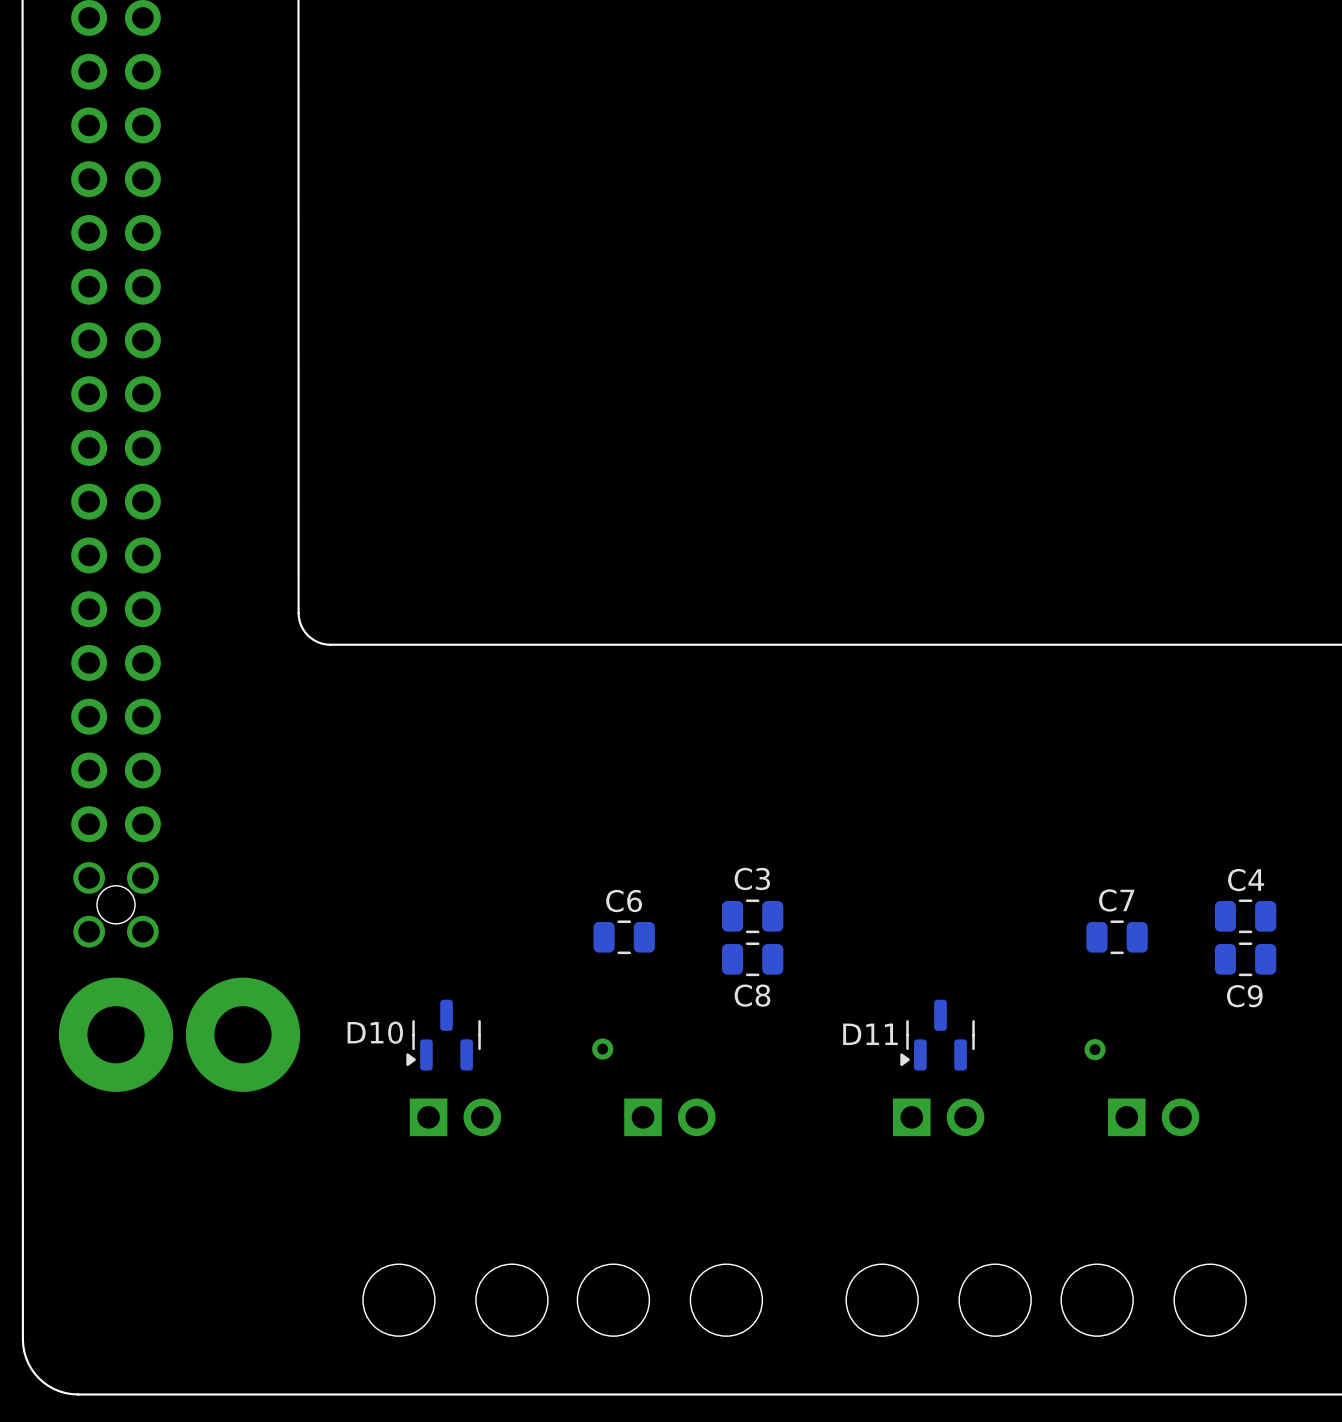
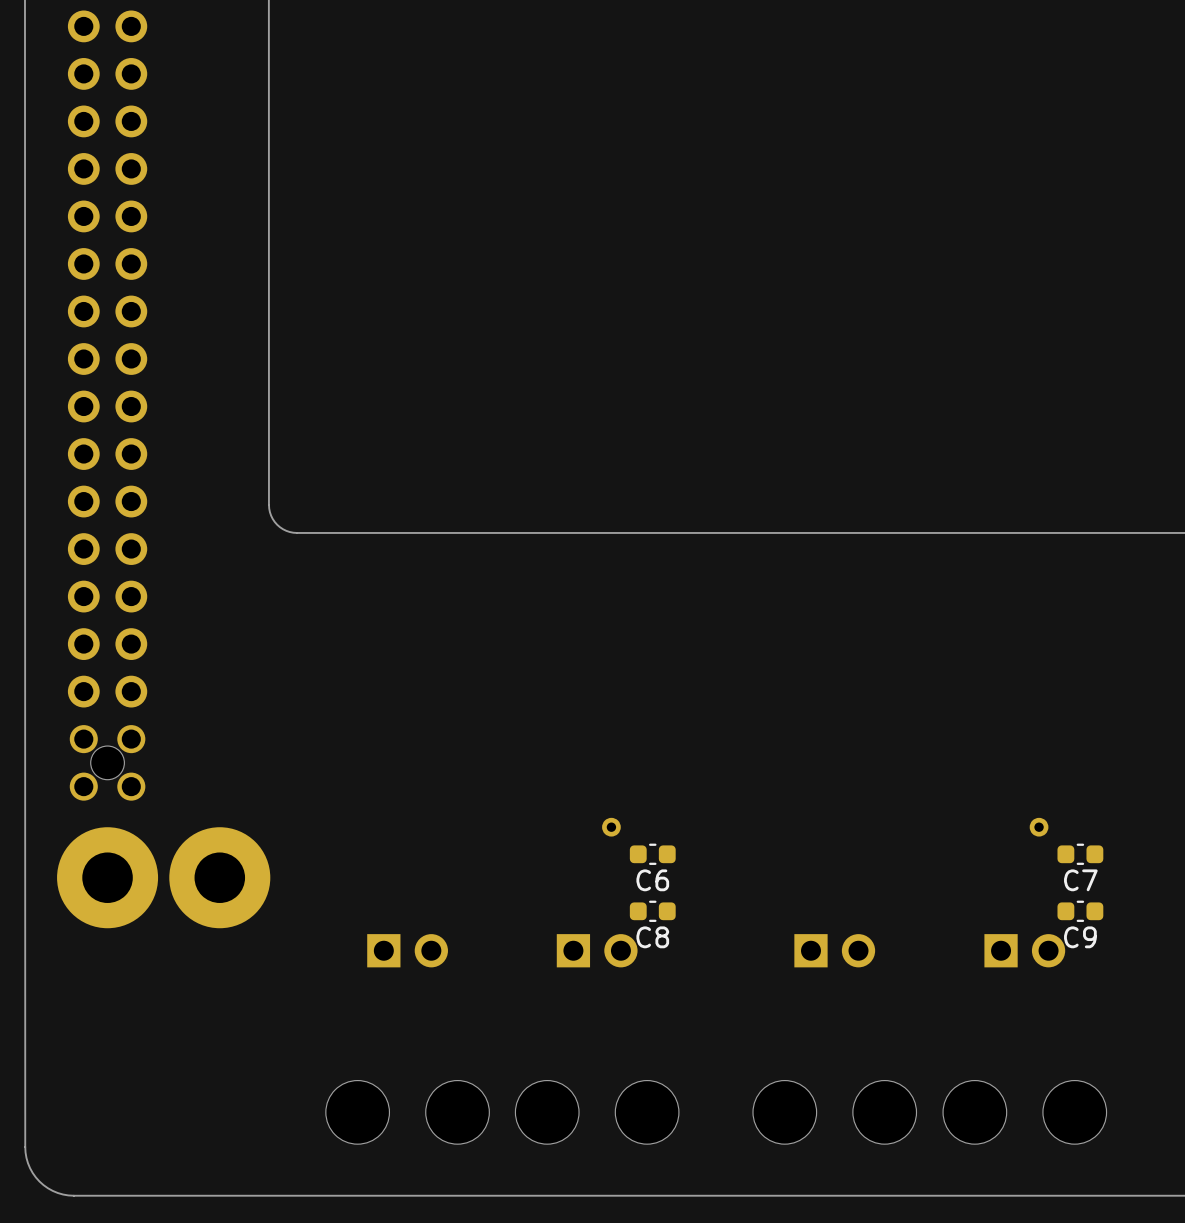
C7 name position: C7 (1116, 900) -> C7 (1080, 880)
C6 name position: C6 (624, 901) -> C6 (652, 880)
C3: (752, 916) -> none
C4: (1245, 916) -> none
C6 footprint: [593, 920, 655, 955] -> [629, 843, 676, 865]
C7 footprint: [1086, 920, 1148, 955] -> [1057, 843, 1104, 865]
C8 footprint: [721, 942, 784, 977] -> [629, 900, 676, 922]
C9 footprint: [1214, 942, 1277, 977] -> [1057, 900, 1104, 922]
D10: (443, 1035) -> none
D11: (937, 1035) -> none
part position: (602, 1049) -> (611, 827)
part position: (1095, 1049) -> (1039, 827)

